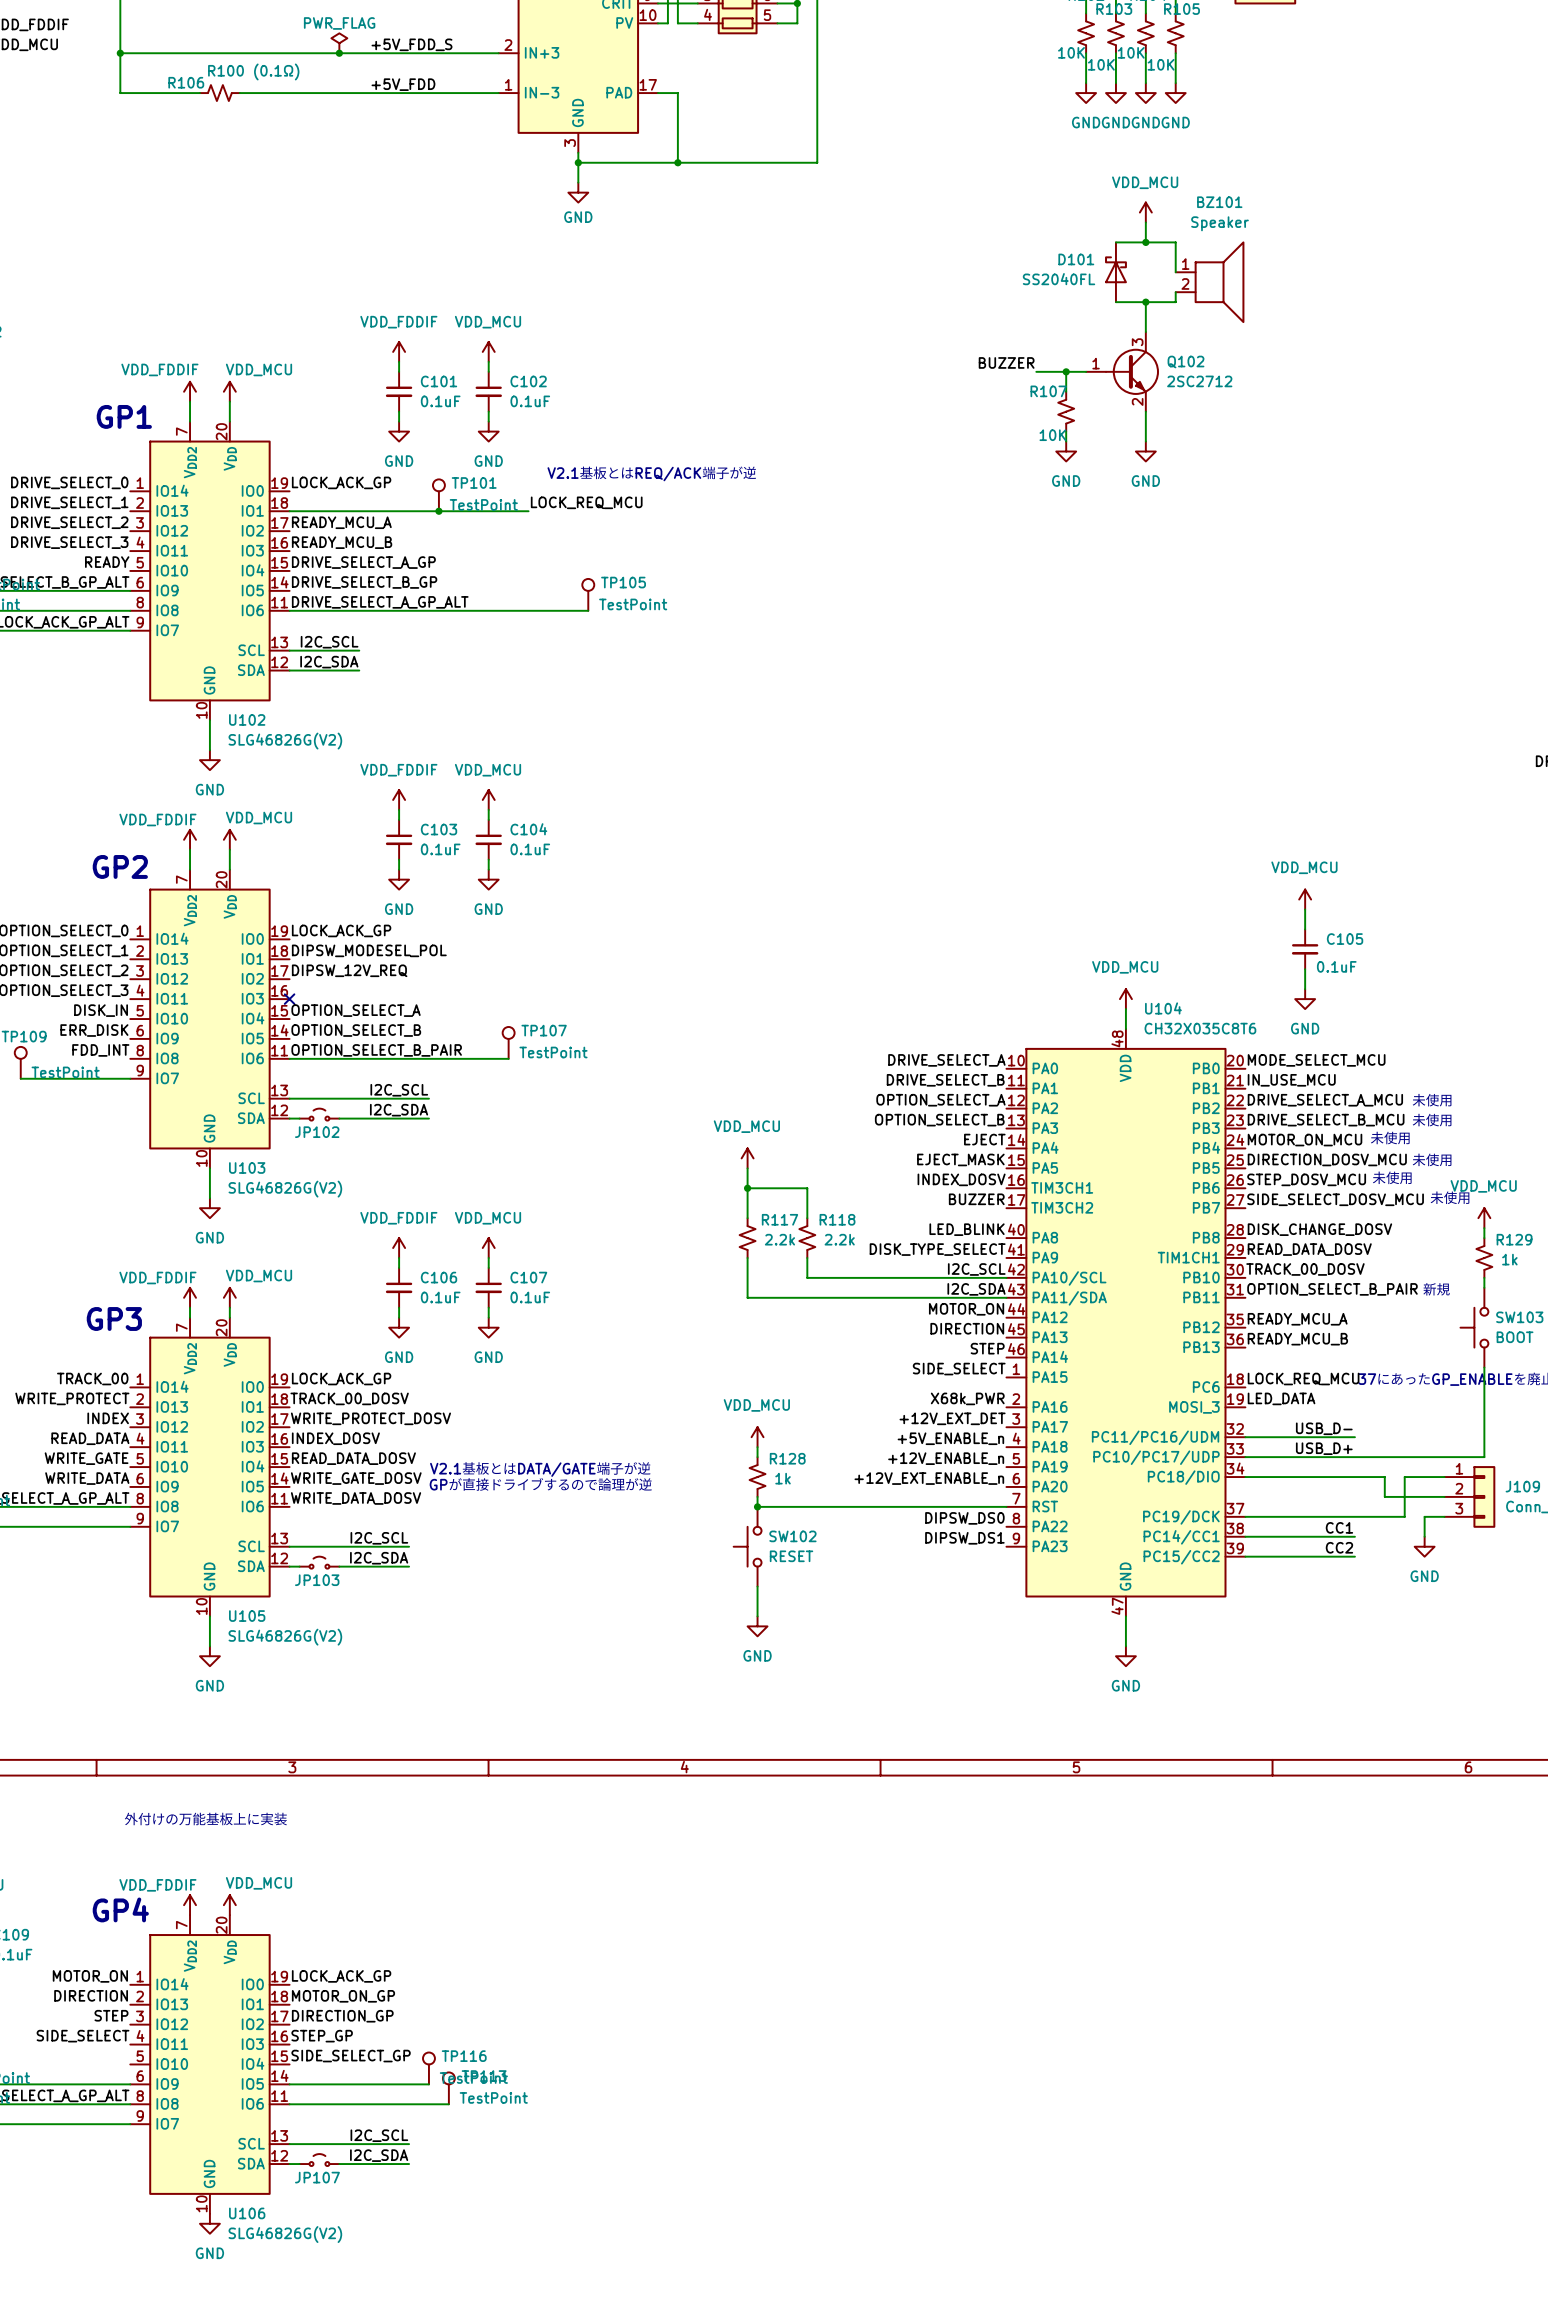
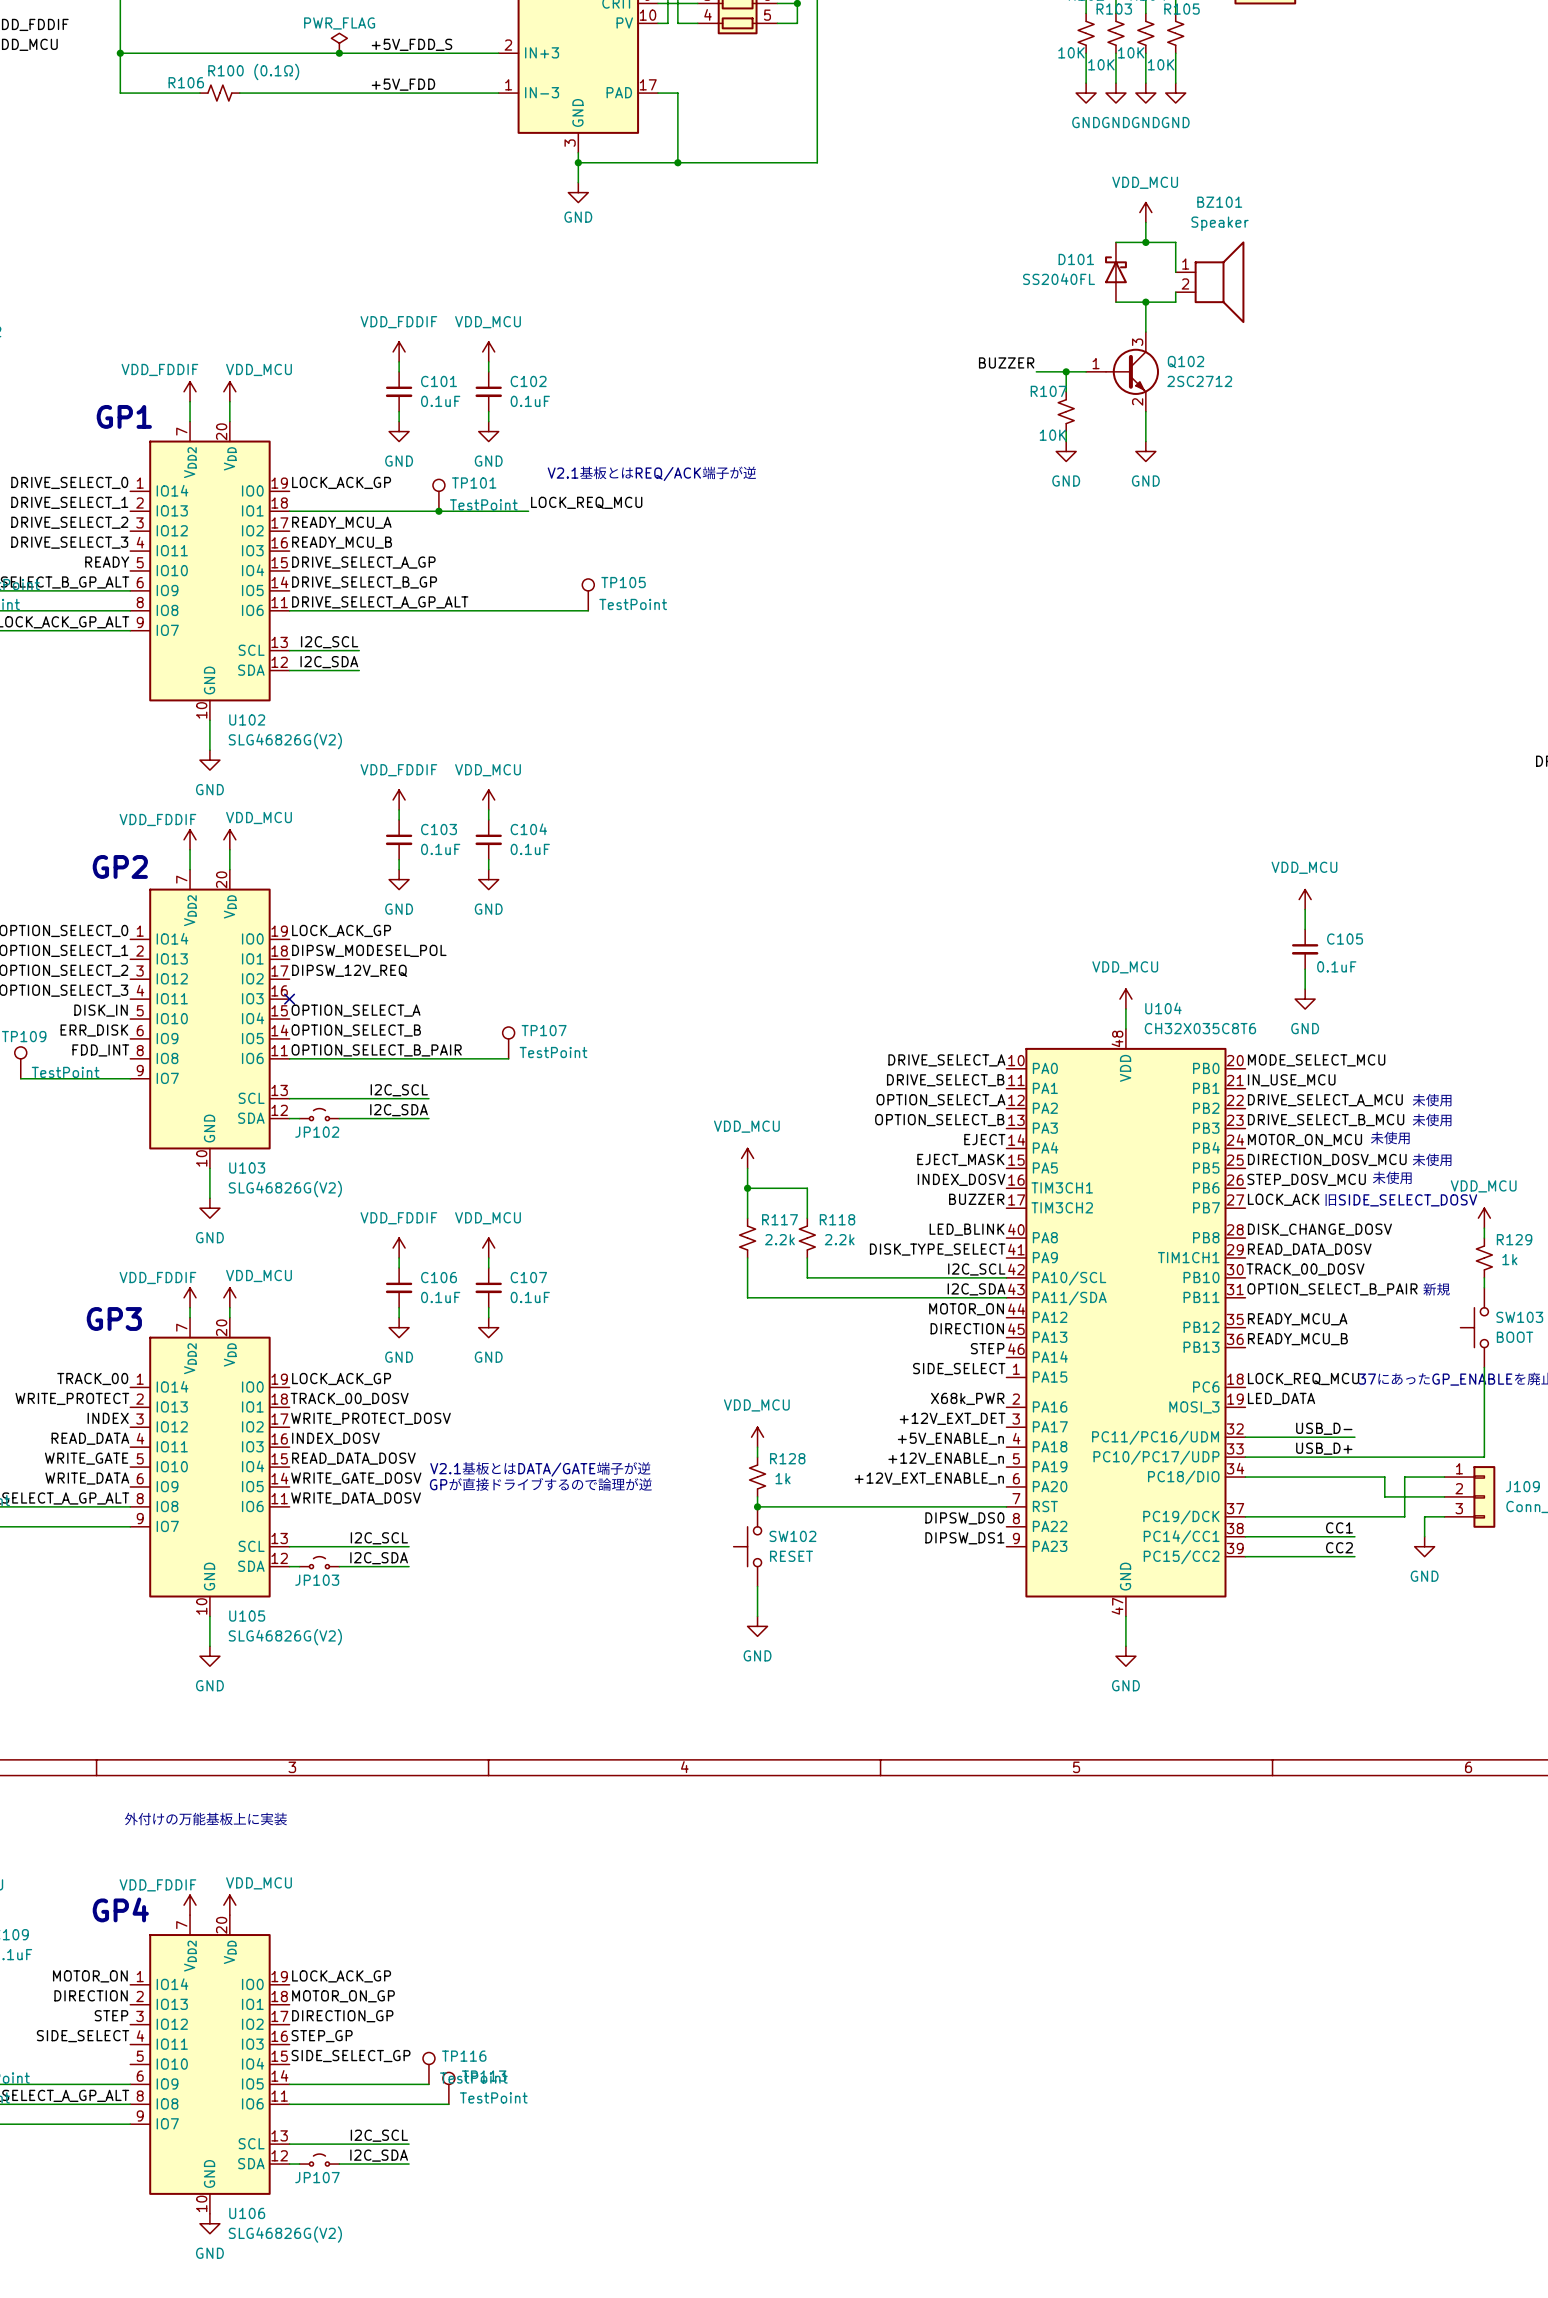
text: 未使用 (1449, 1197) -> none
label: SIDE_SELECT_DOSV_MCU (1335, 1199) -> LOCK_ACK (1283, 1199)
text: none -> 旧SIDE_SELECT_DOSV (1401, 1199)

